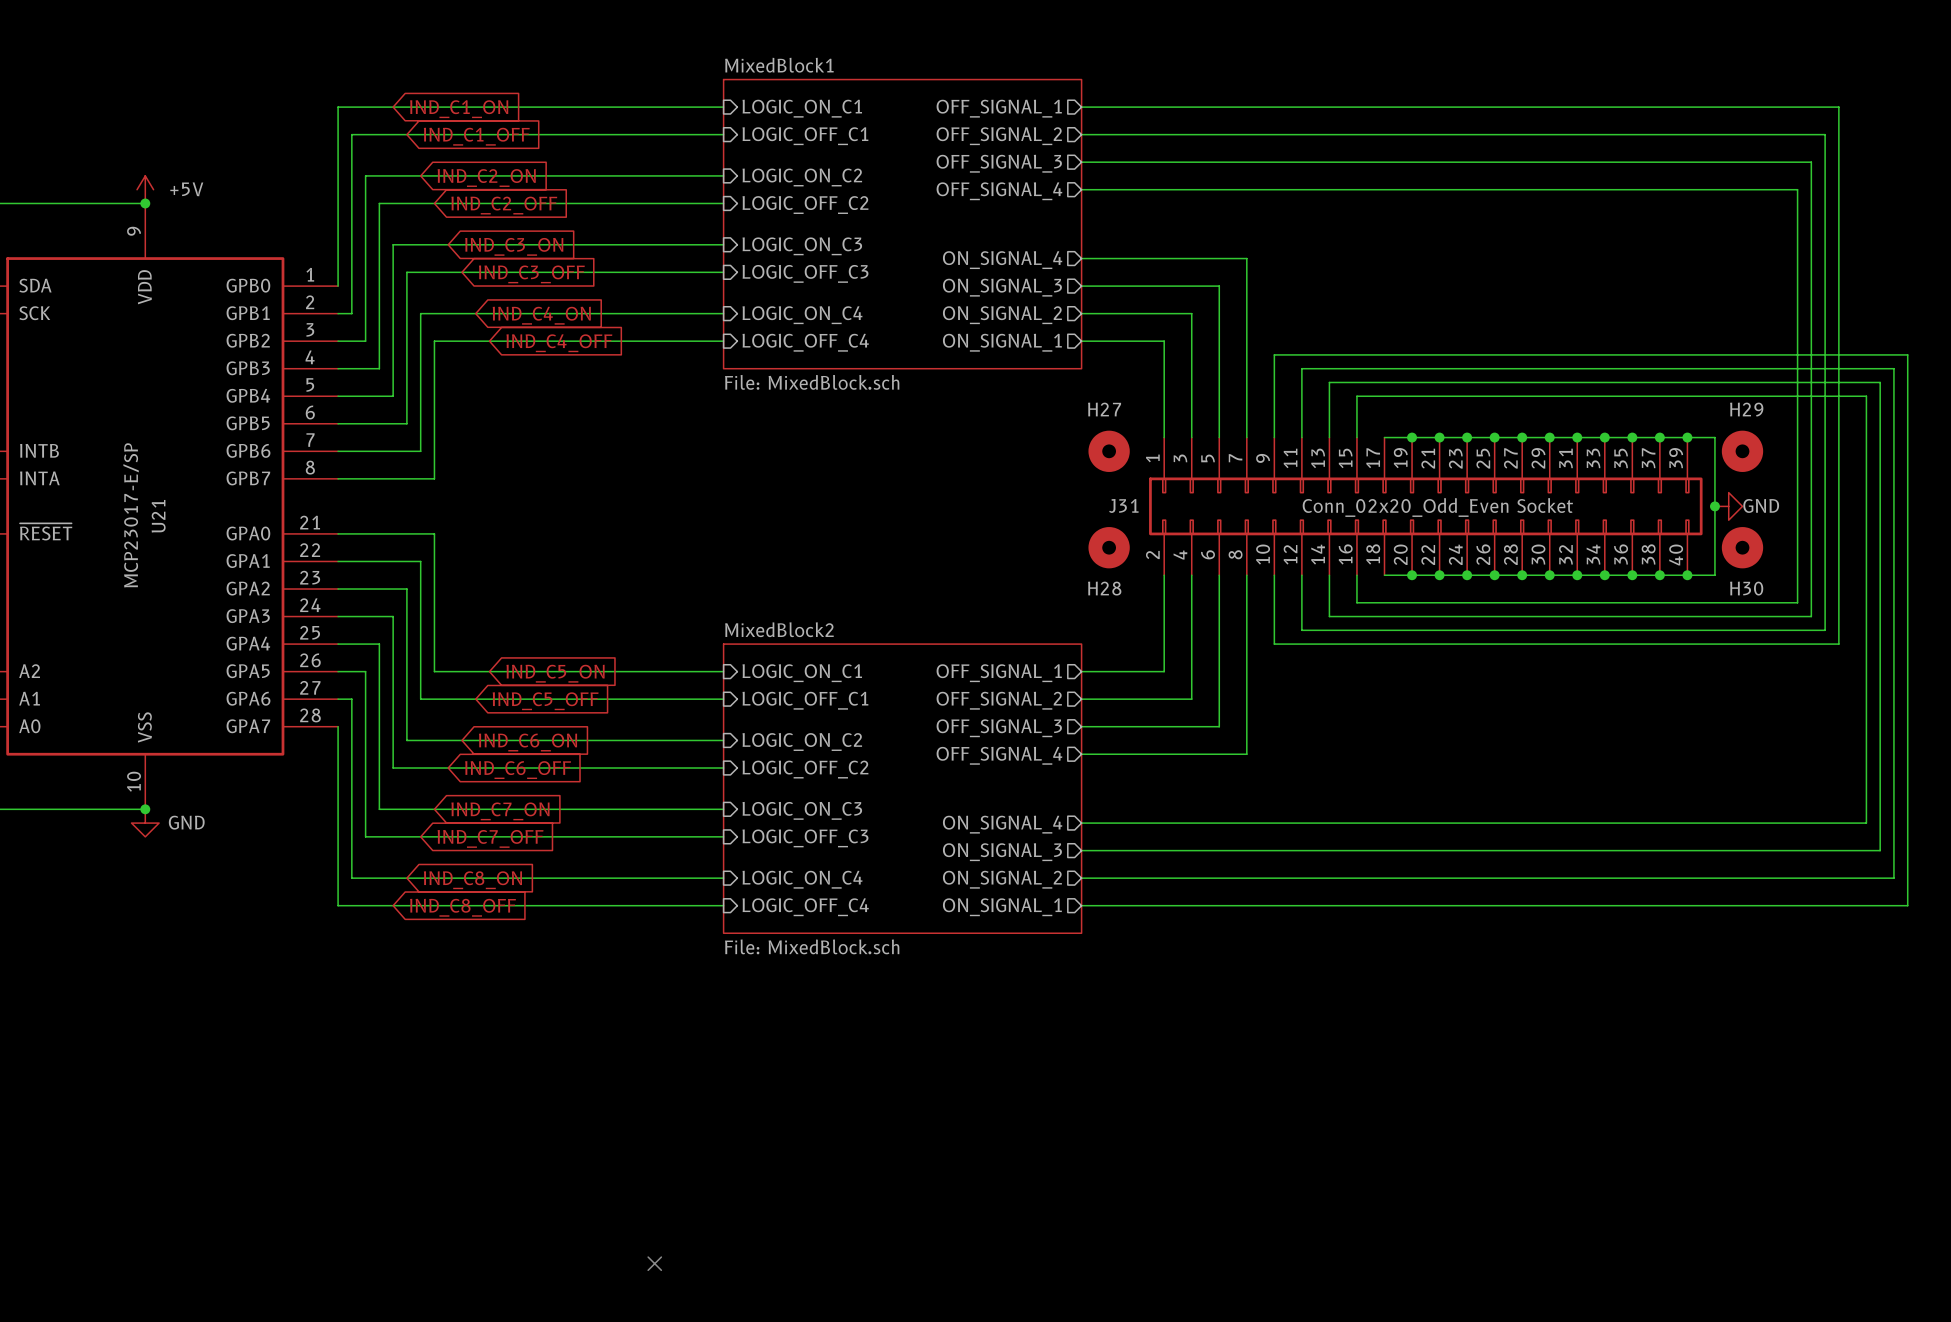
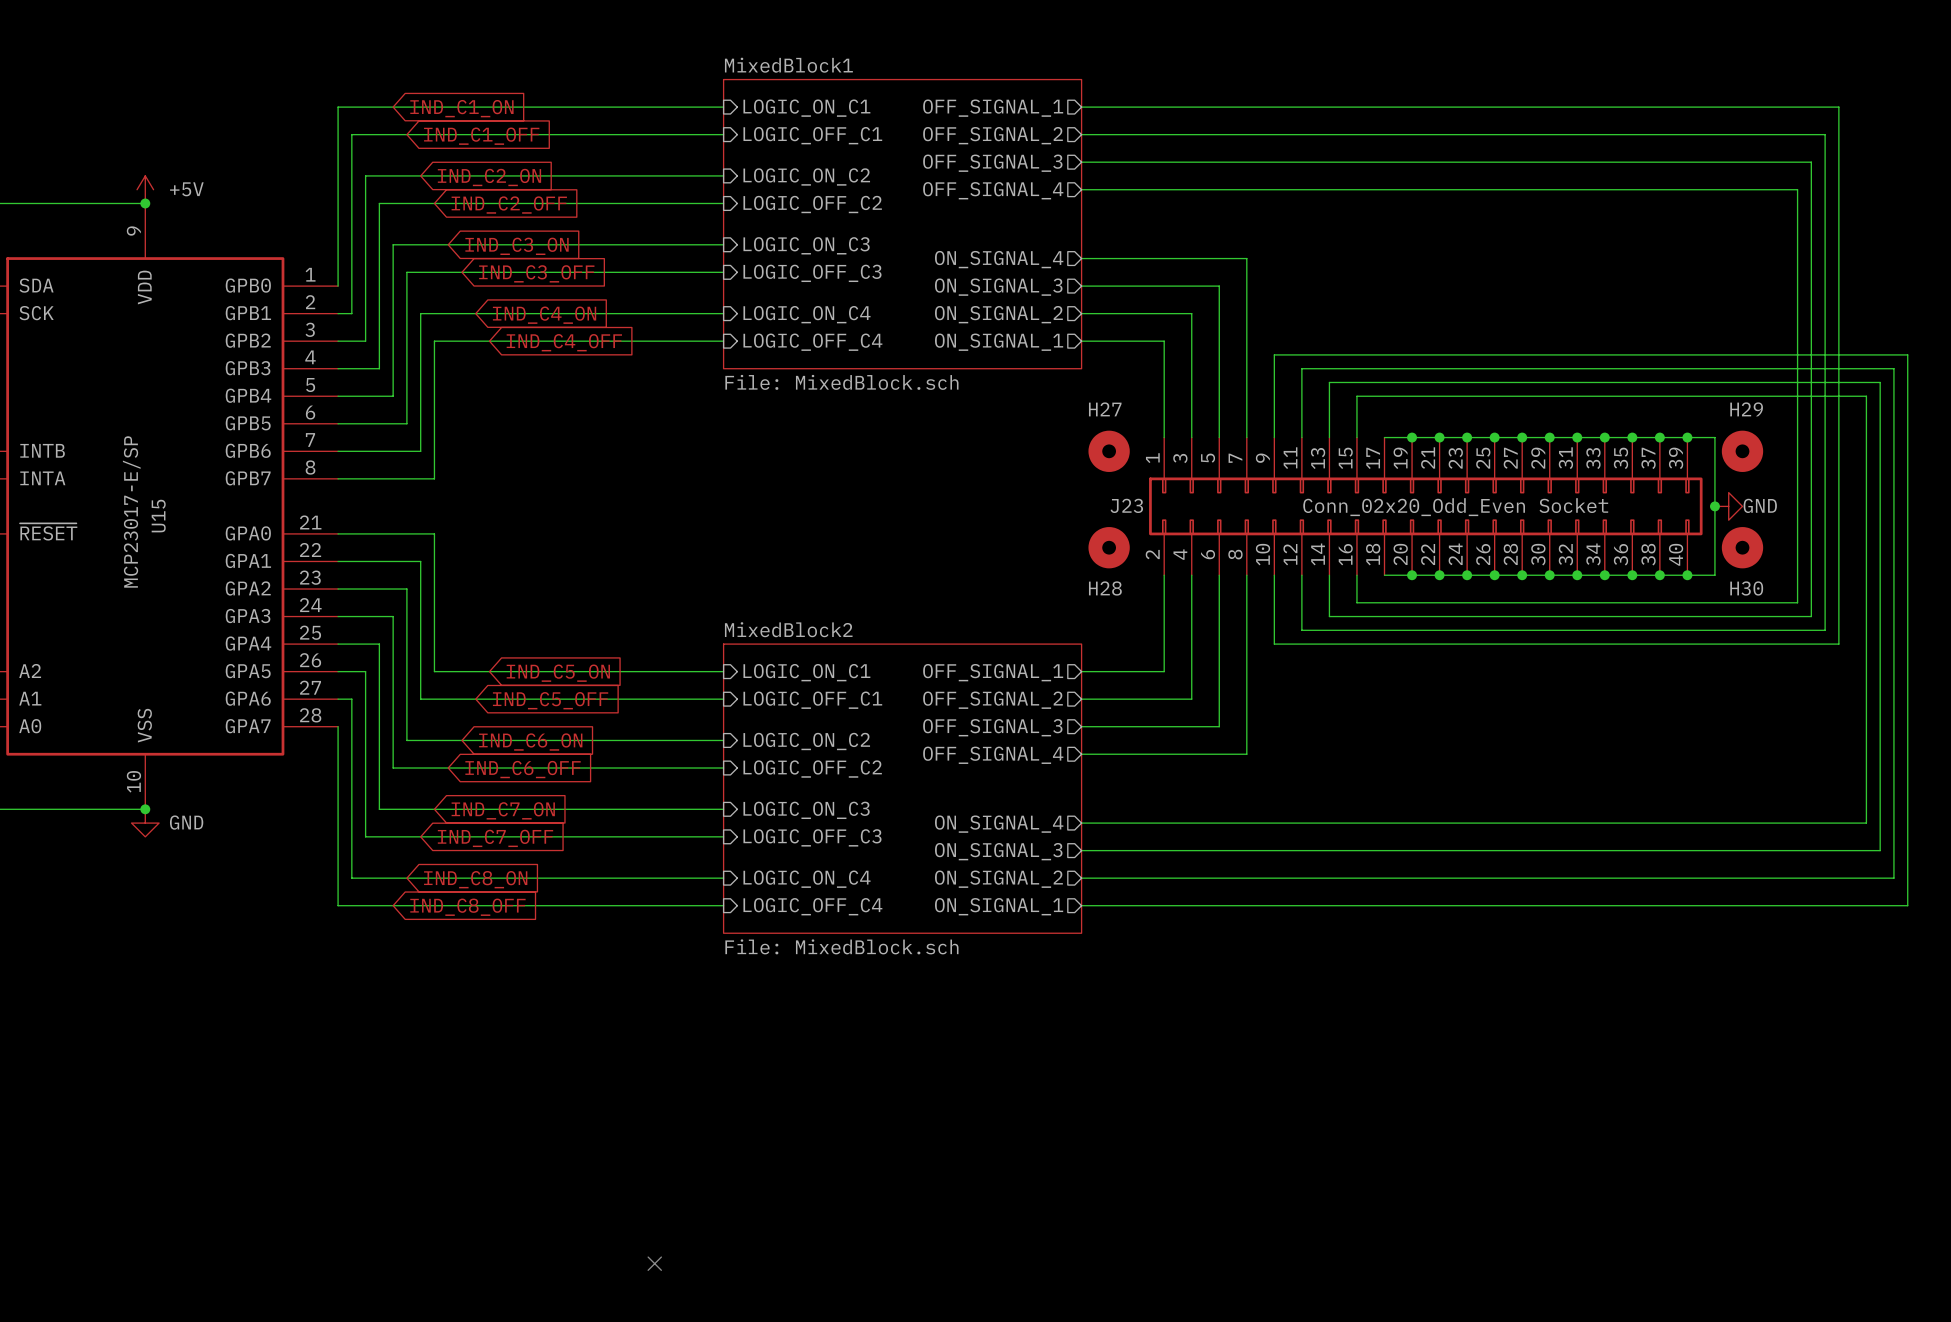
J31 name: J31 (1123, 505) -> J23 (1126, 505)
U21 name: U21 (158, 516) -> U15 (158, 516)

